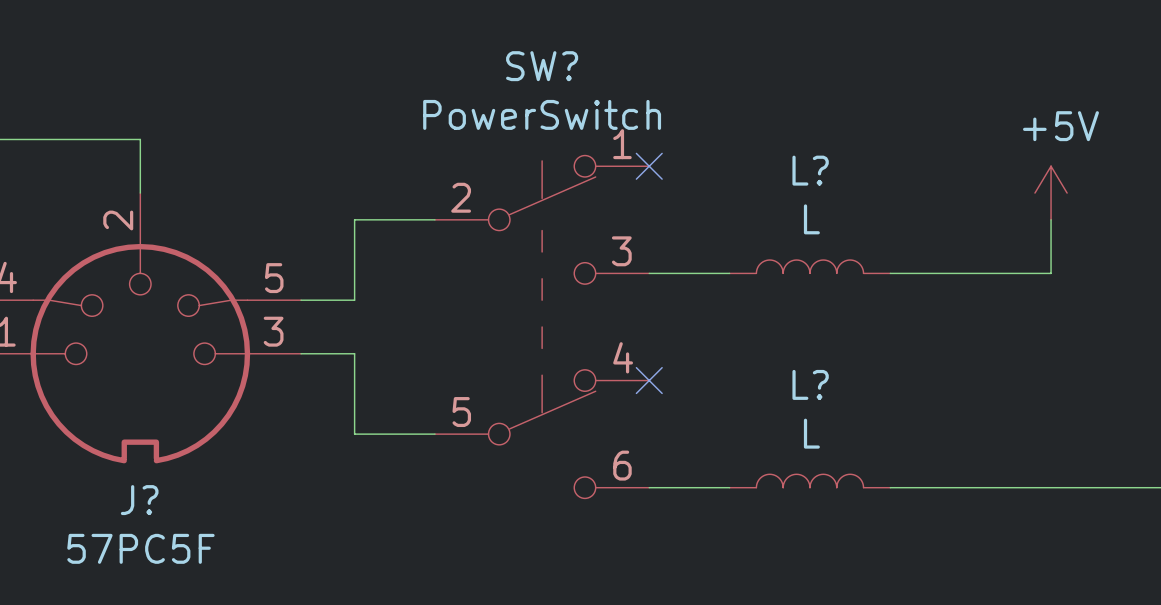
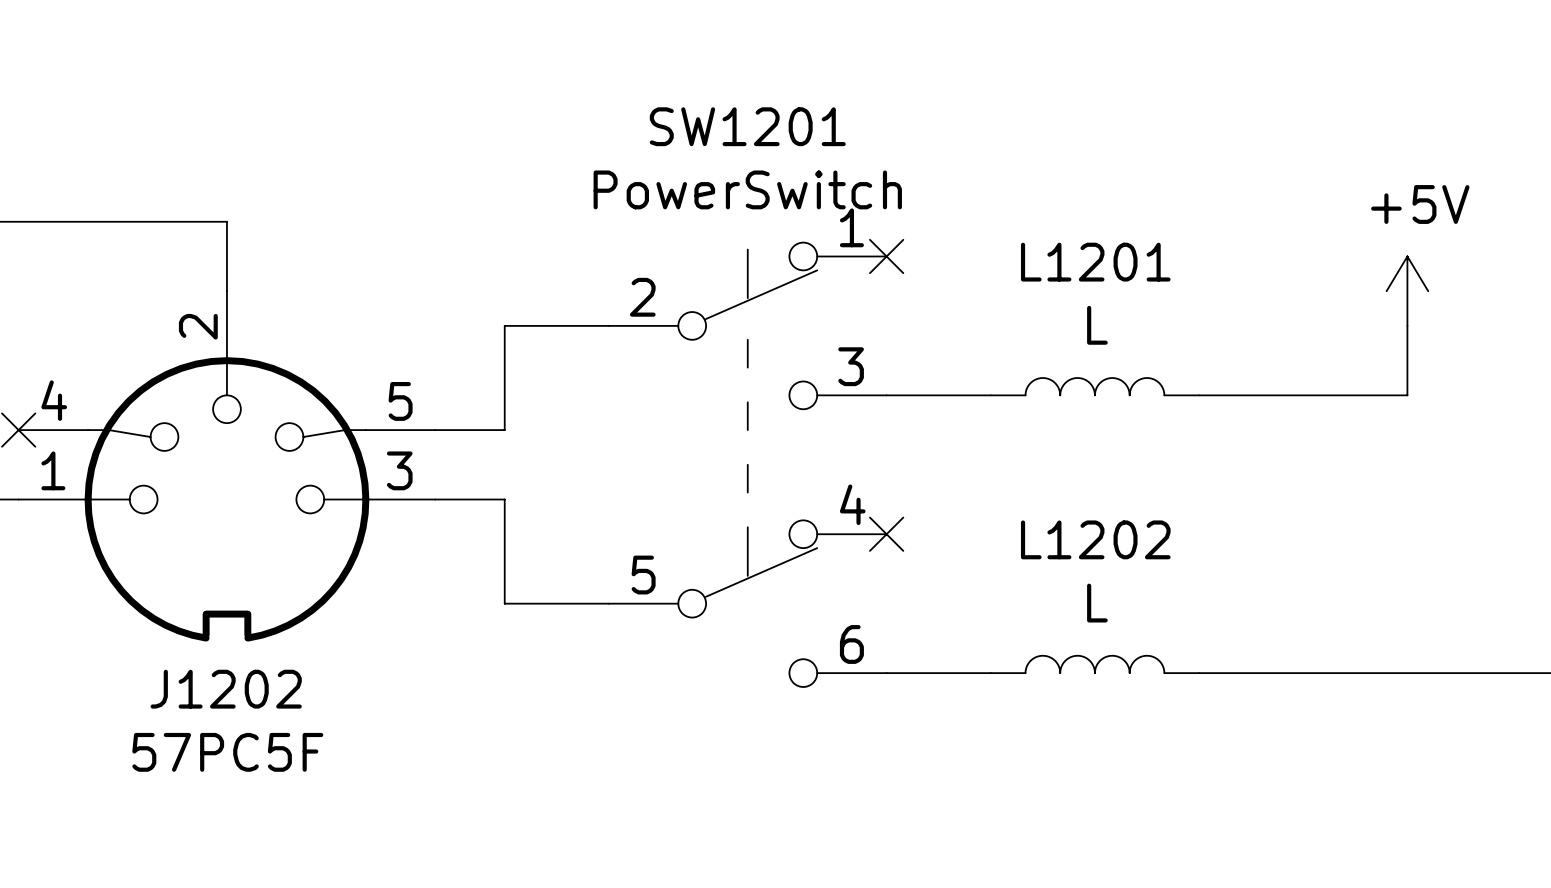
SW? name: SW? (542, 66) -> SW1201 (747, 126)
L? name: L? (810, 170) -> L1201 (1095, 262)
L? name: L? (810, 384) -> L1202 (1095, 539)
J? name: J? (139, 500) -> J1202 (226, 689)

